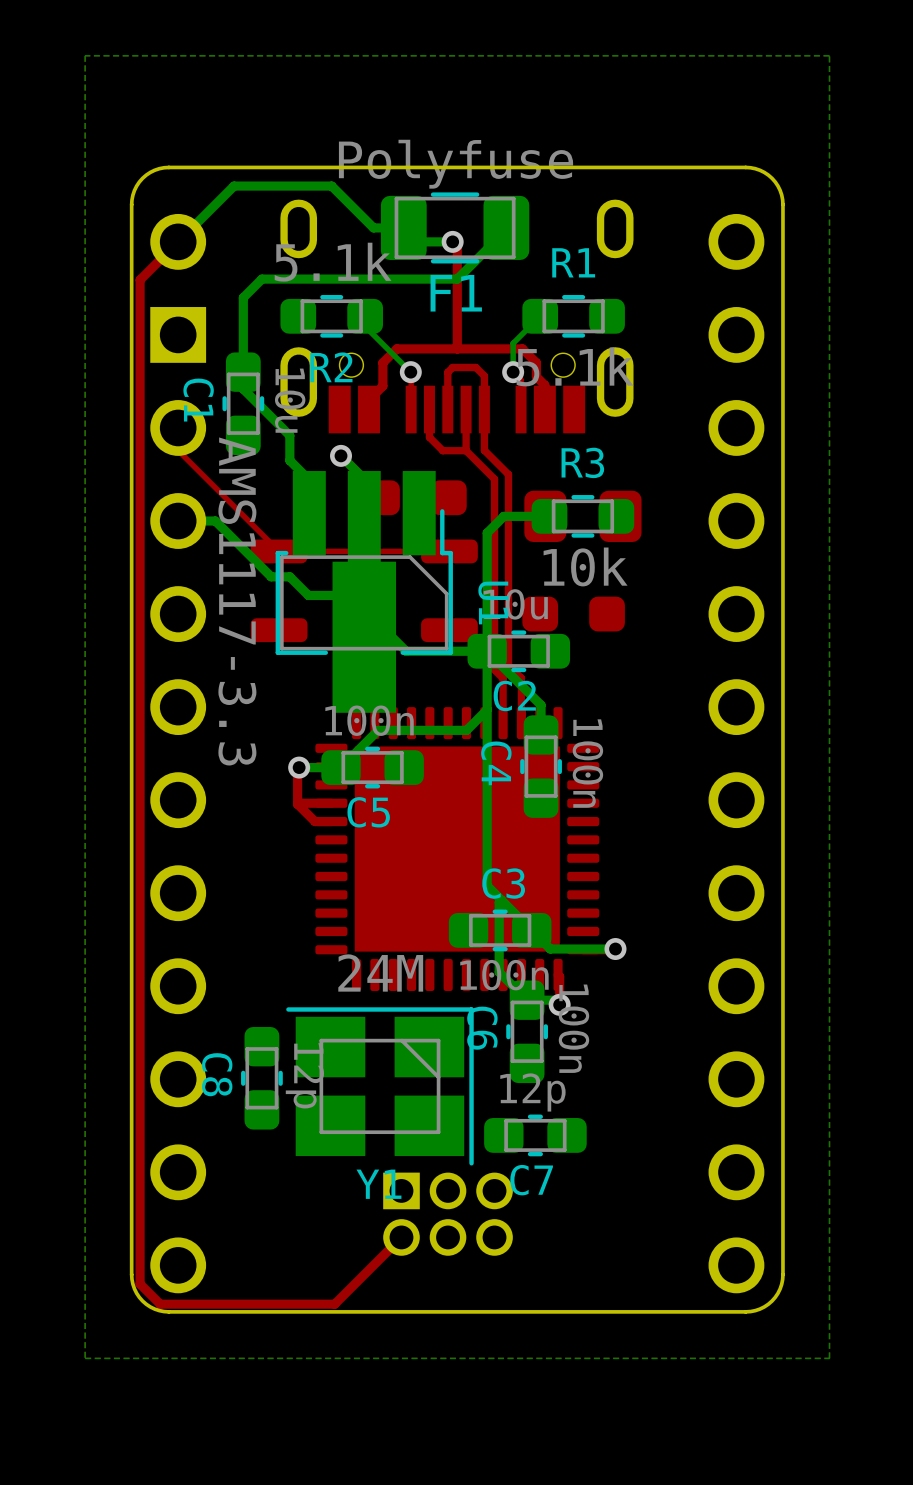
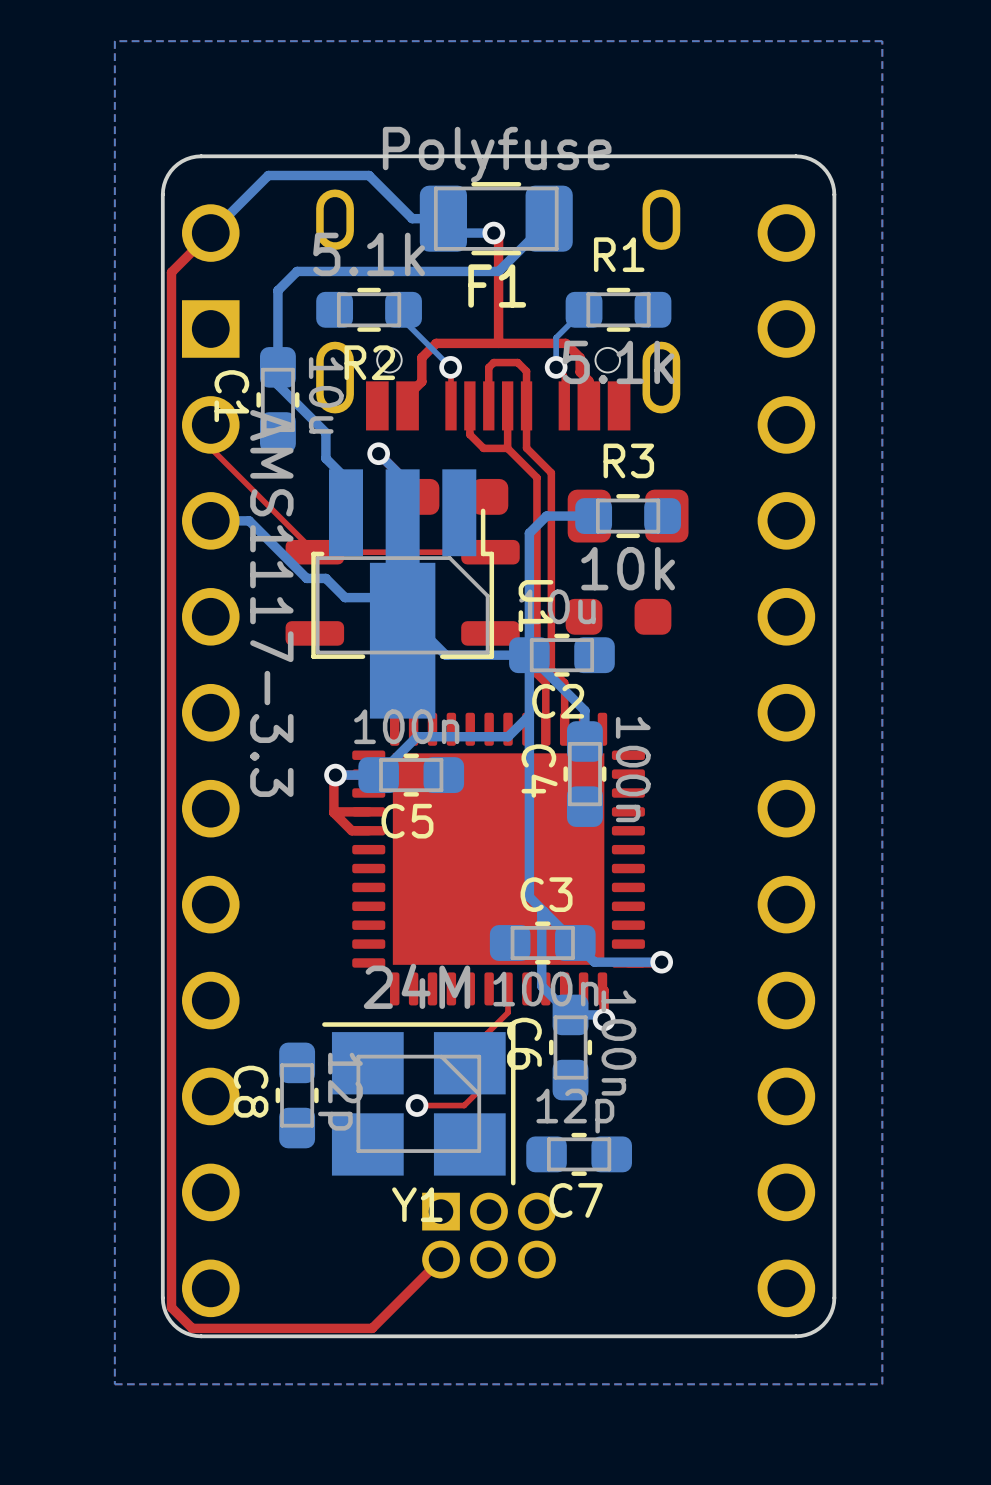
top track: none -> (508, 988) (508, 1012) (486, 1033) (486, 1082) (464, 1105) (417, 1105)
via: none -> (417, 1105)

